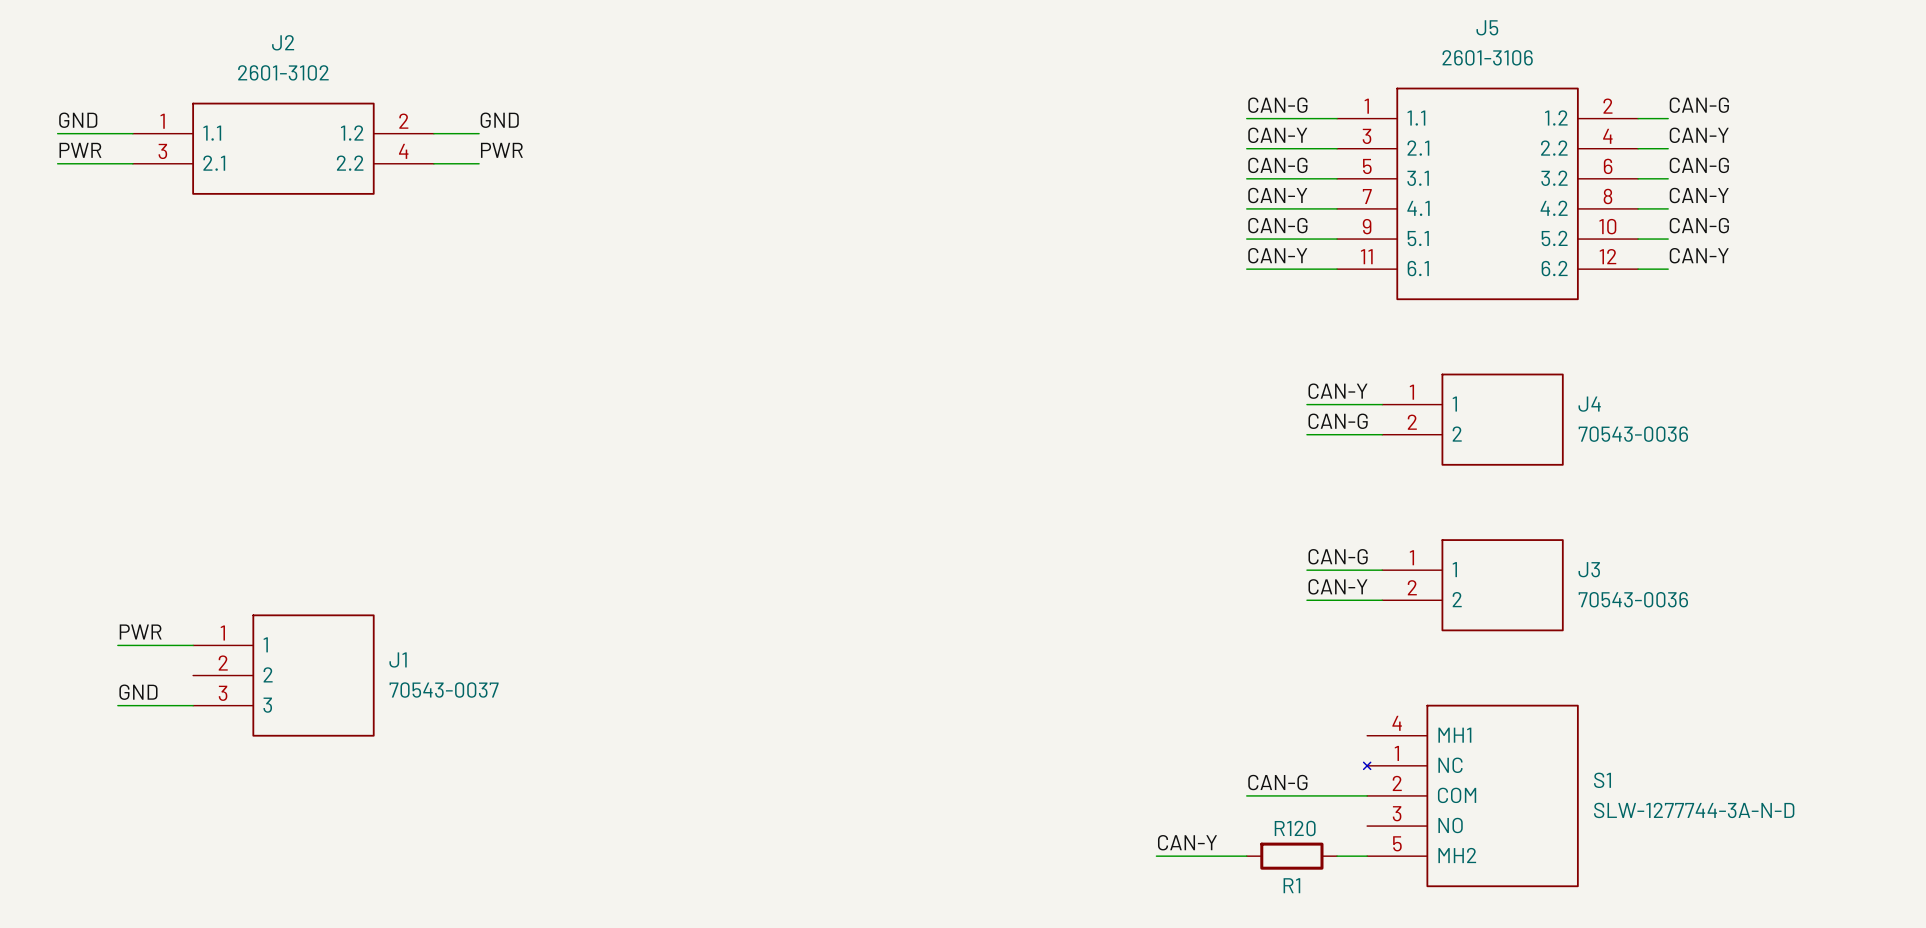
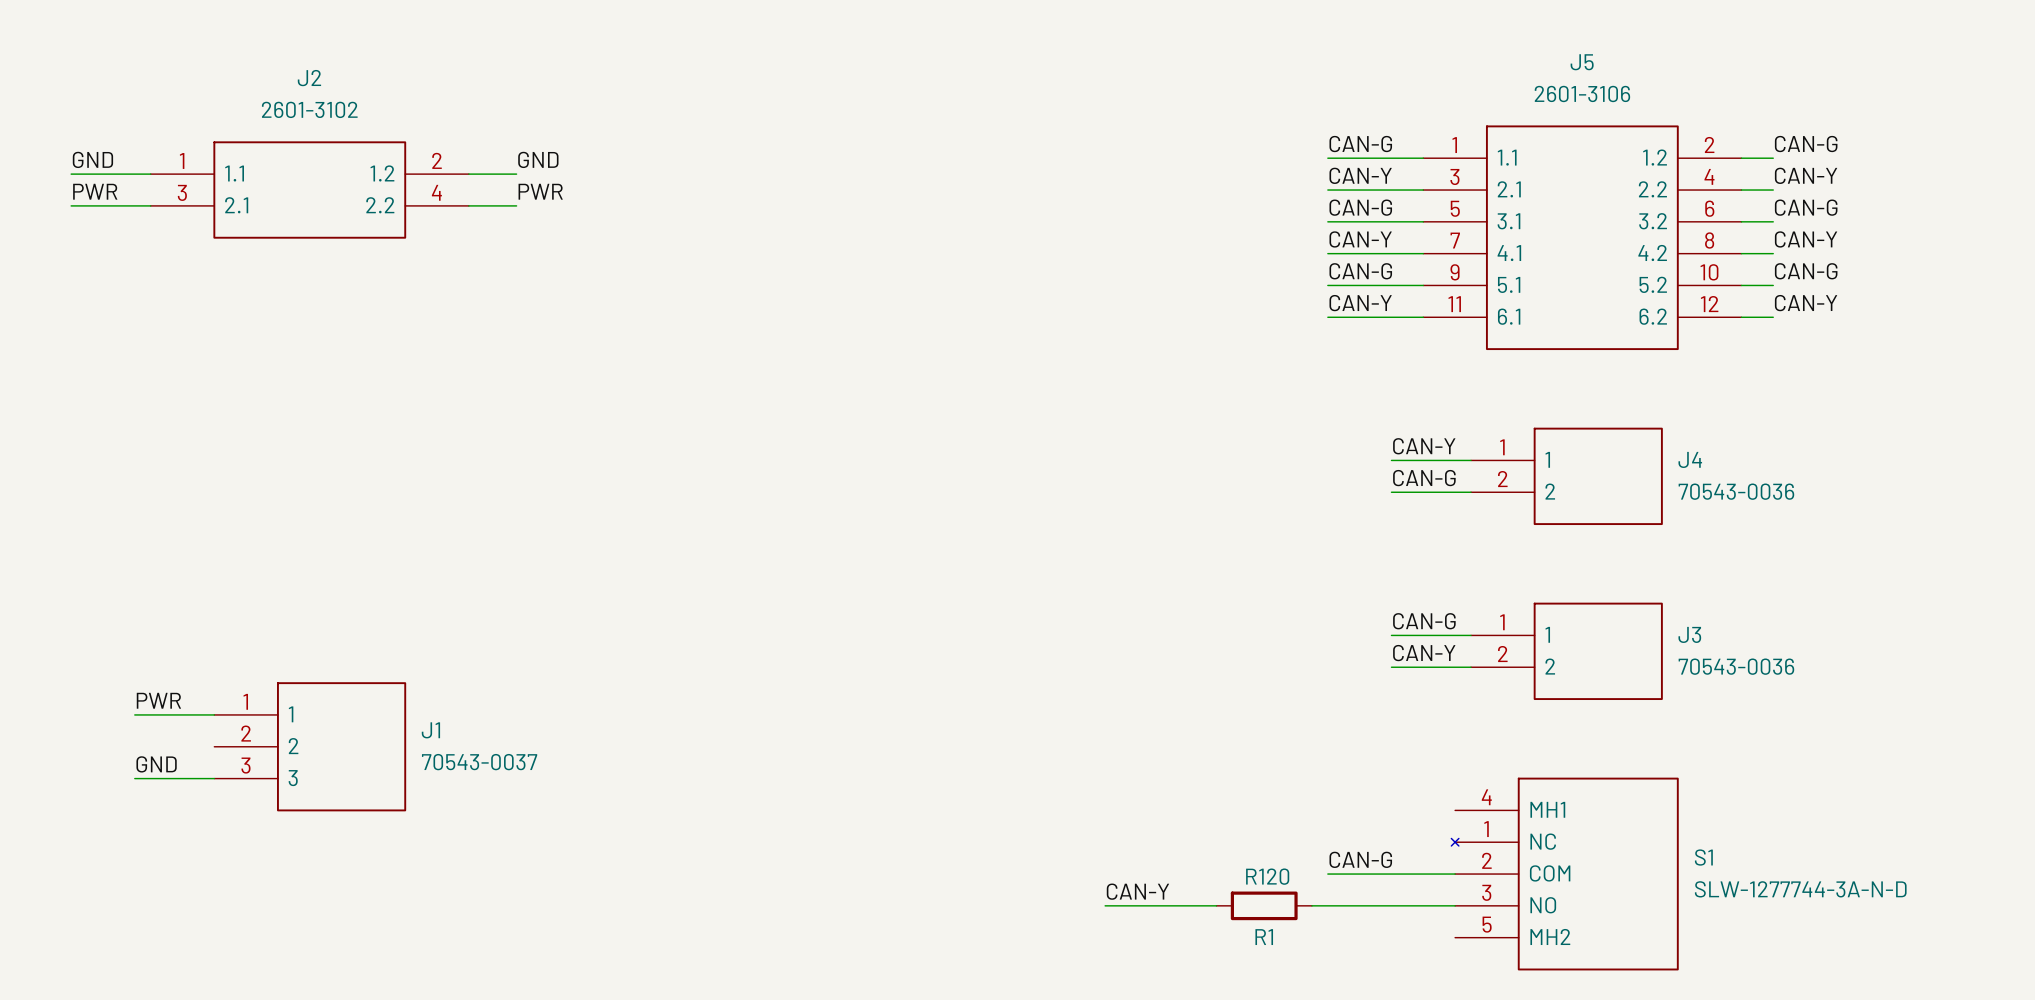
wire: none -> (1105, 905) (1216, 905)
wire: none -> (1311, 905) (1455, 905)
label position: CAN-Y (1187, 842) -> CAN-Y (1137, 891)
wire: (1156, 856) (1246, 856) -> none
R1 position: (1291, 856) -> (1264, 905)
wire: (1337, 856) (1367, 856) -> none

